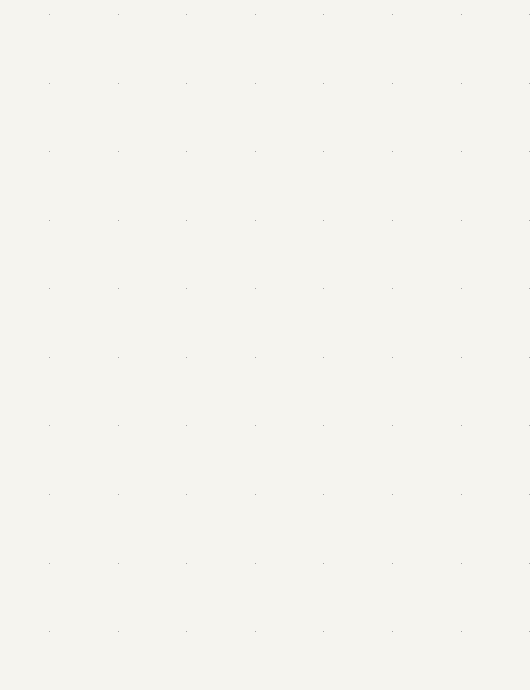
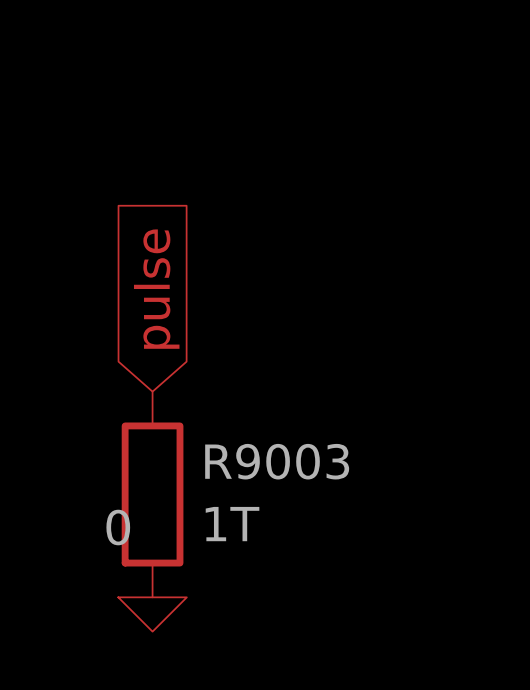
global label: none -> pulse (156, 289)
R9003: none -> 1T (152, 494)
power symbol: none -> 0 (152, 614)

